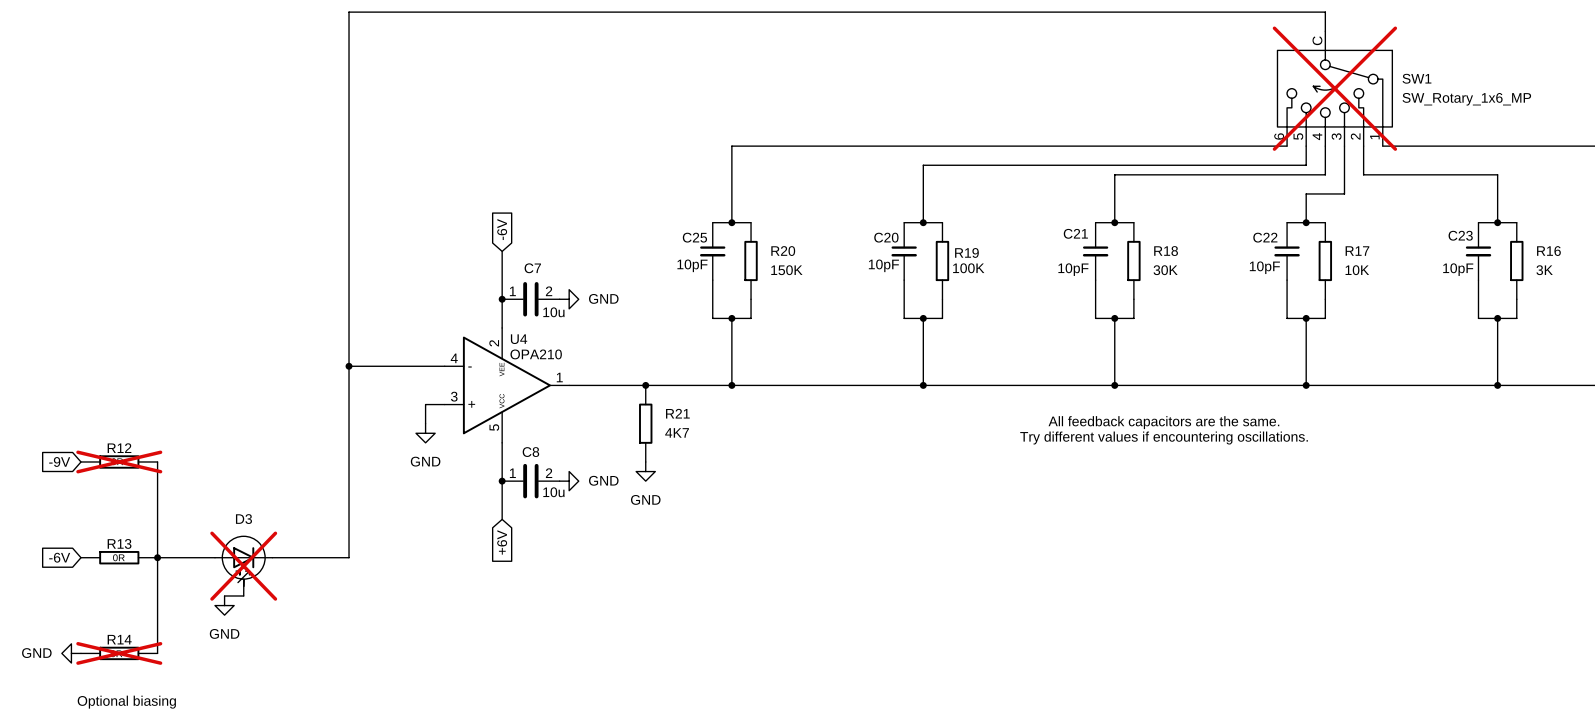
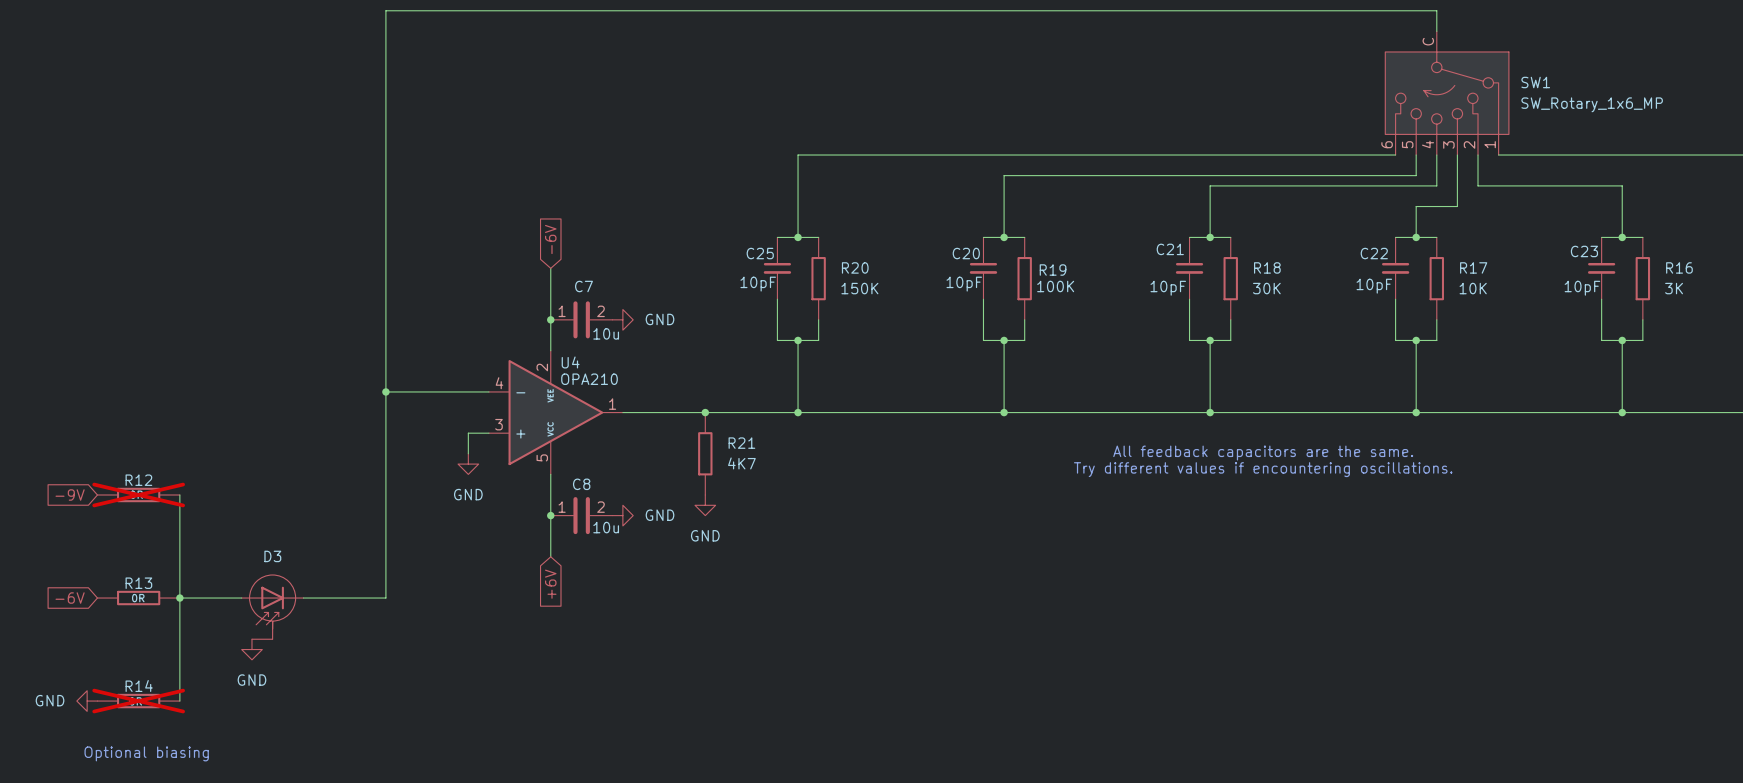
SW1 do-not-place cross: (1334, 88) -> none
D3 do-not-place cross: (243, 566) -> none

